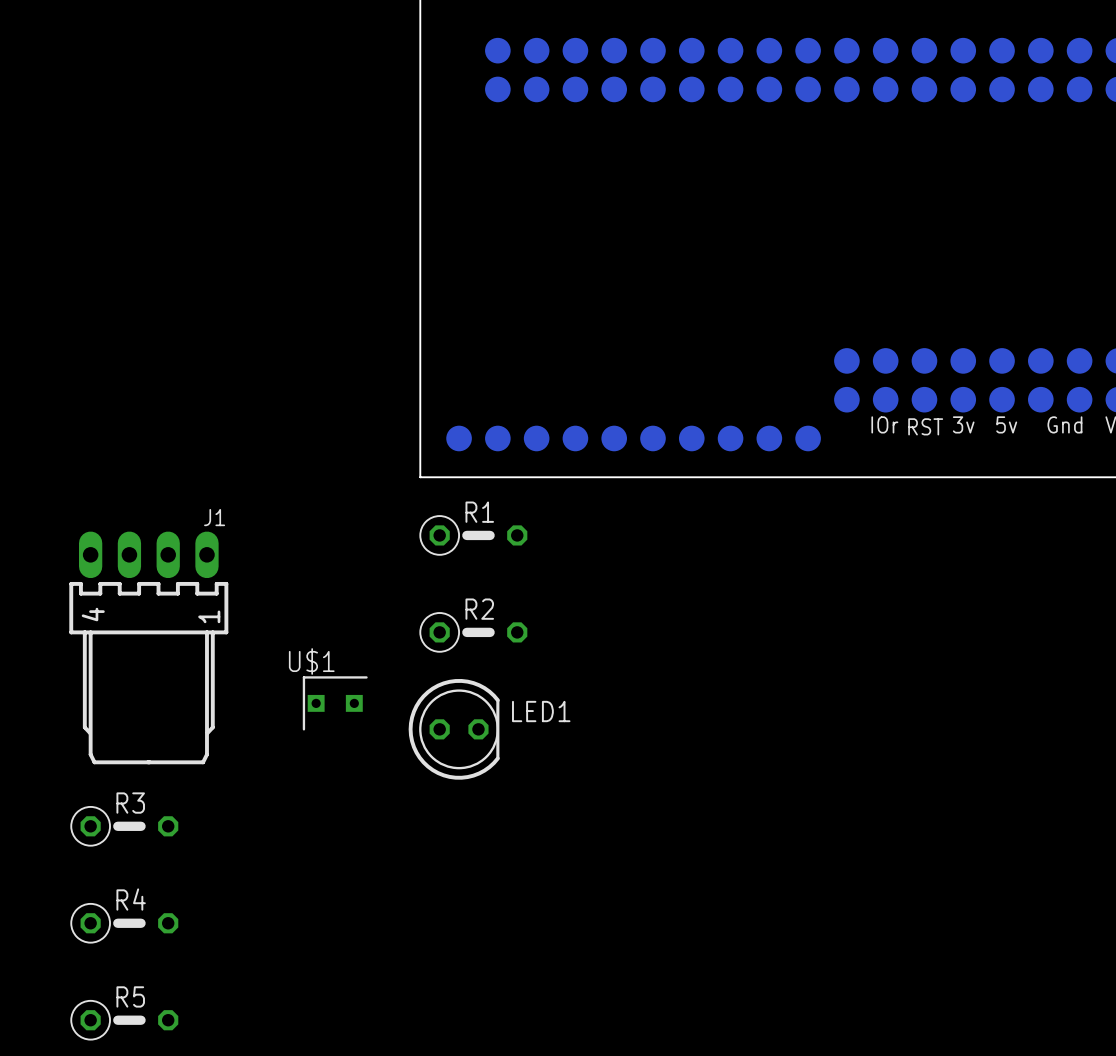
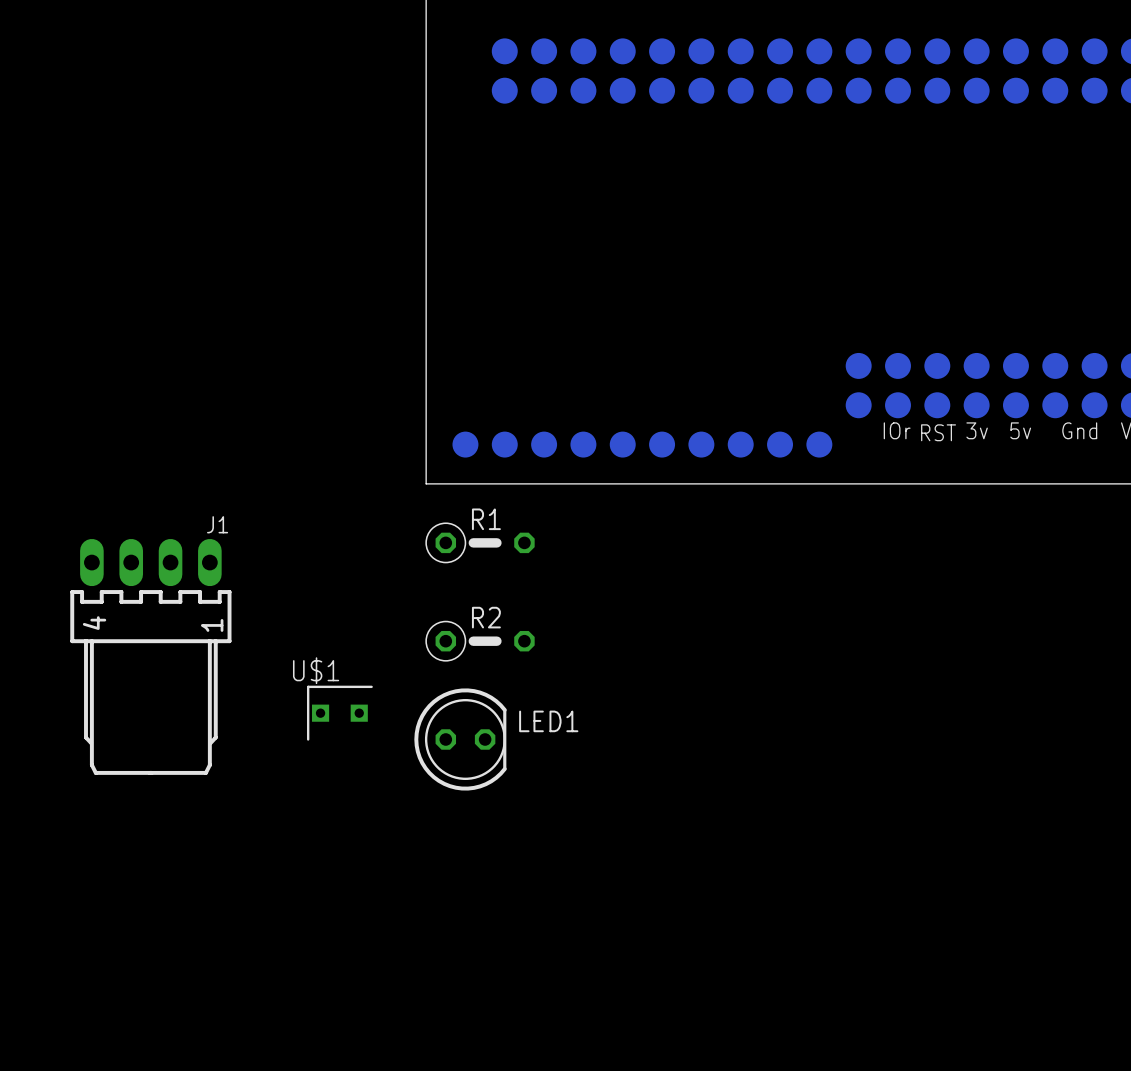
R3: (124, 826) -> none
R4: (124, 923) -> none
R5: (124, 1020) -> none

